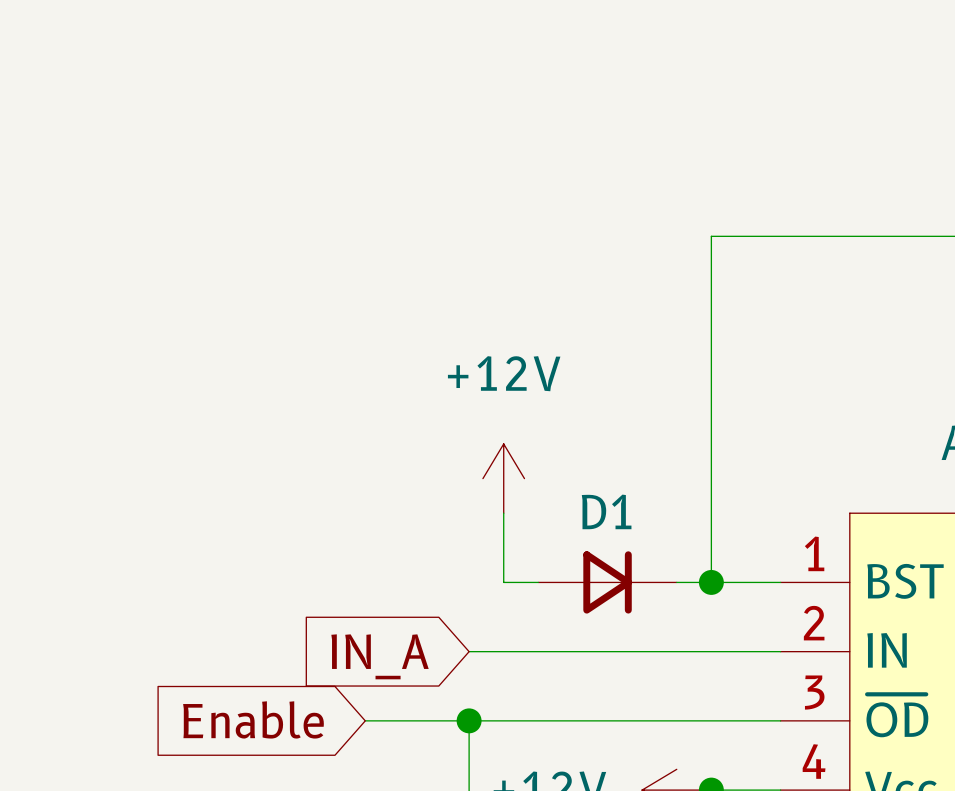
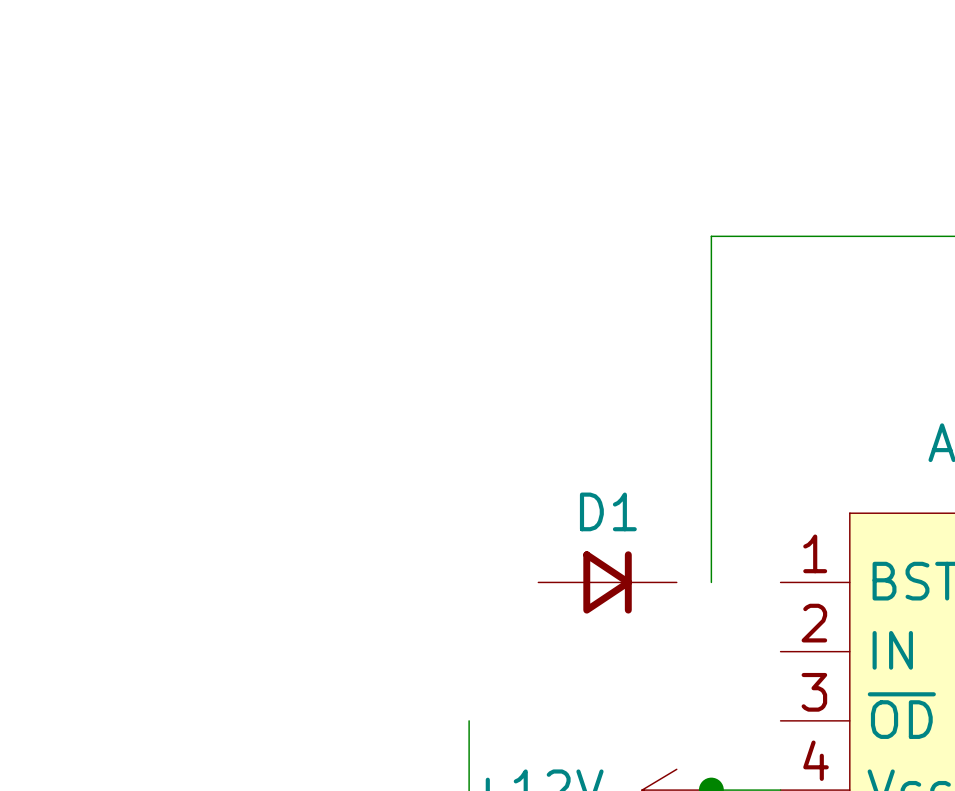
power symbol: +12V (503, 478) -> none
wire: (503, 513) (503, 582) (538, 582) -> none
wire: (676, 582) (780, 582) -> none
junction: (711, 582) -> none
wire: (469, 651) (780, 651) -> none
global label: IN_A (380, 656) -> none
global label: Enable (253, 719) -> none
wire: (365, 720) (780, 720) -> none
junction: (469, 720) -> none

